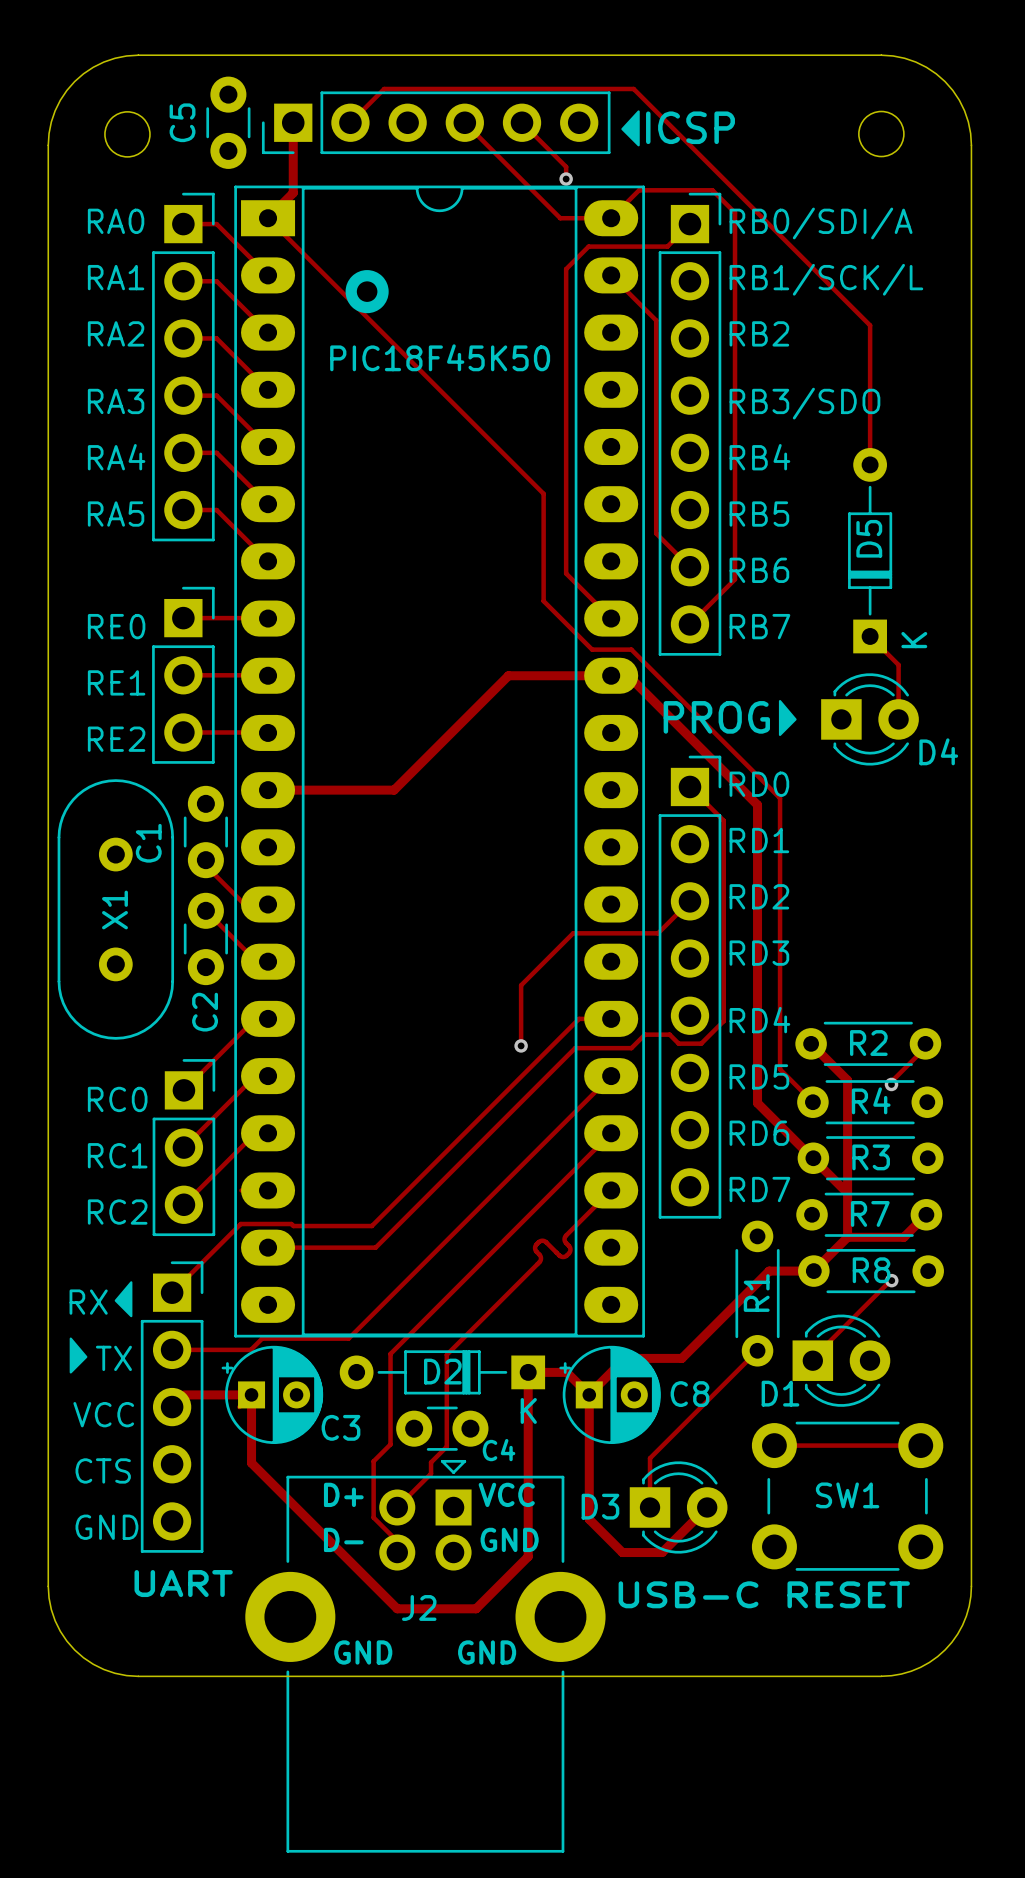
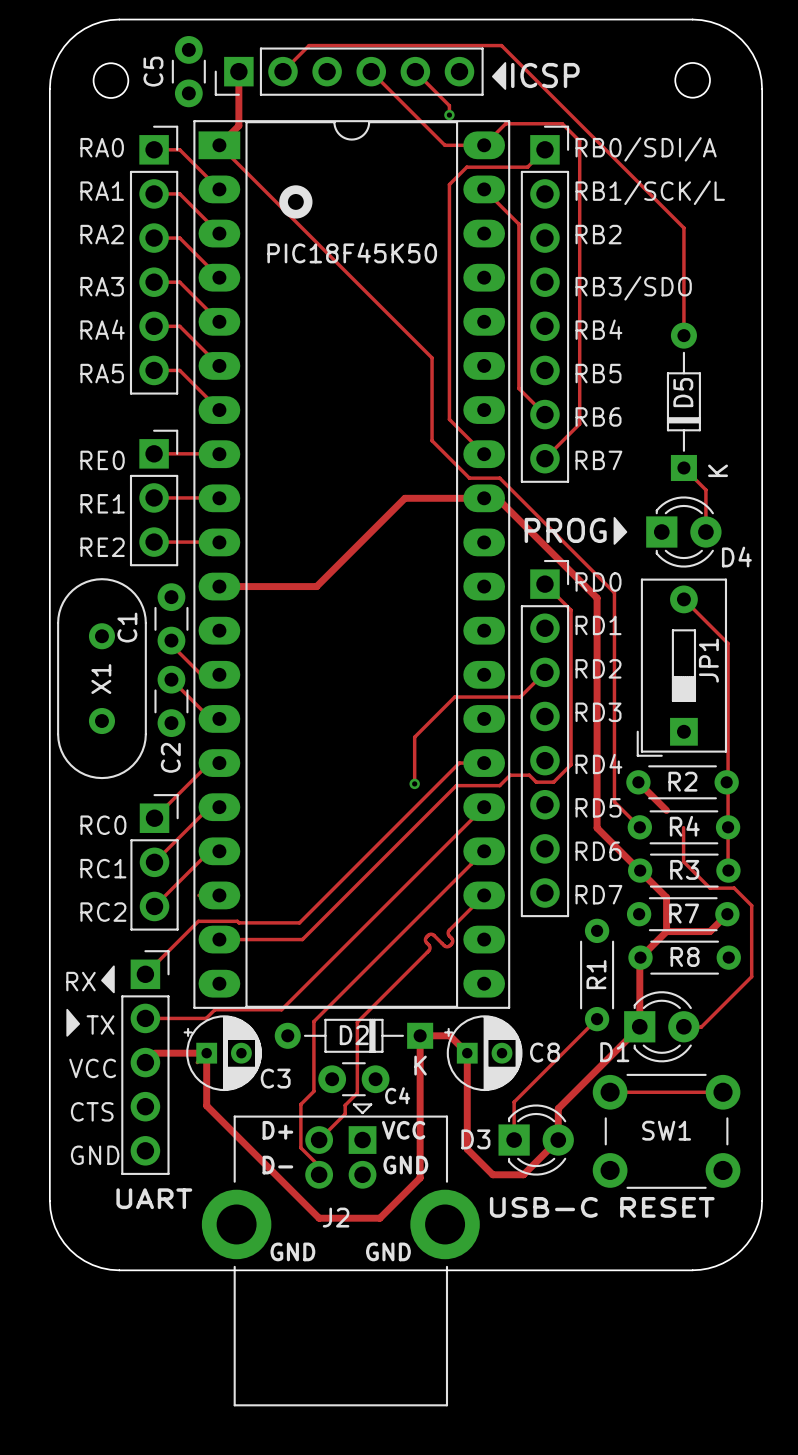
track: none -> (683, 599) (728, 643) (727, 879)
JP1: none -> (681, 667)
track: (927, 1045) (891, 1081) (891, 1084) -> none
track: (847, 1080) (847, 1193) -> none
via: (891, 1084) -> none
track: none -> (683, 827) (683, 861) (710, 888) (734, 888) (751, 905) (751, 976) (701, 1027) (683, 1027)
track: none -> (639, 958) (639, 1027)
track: (813, 1271) (769, 1271) (681, 1358) (625, 1358) (589, 1394) -> none
track: (891, 1280) (823, 1348) -> none
via: (891, 1280) -> none
track: none -> (635, 1031) (558, 1108) (558, 1140)

